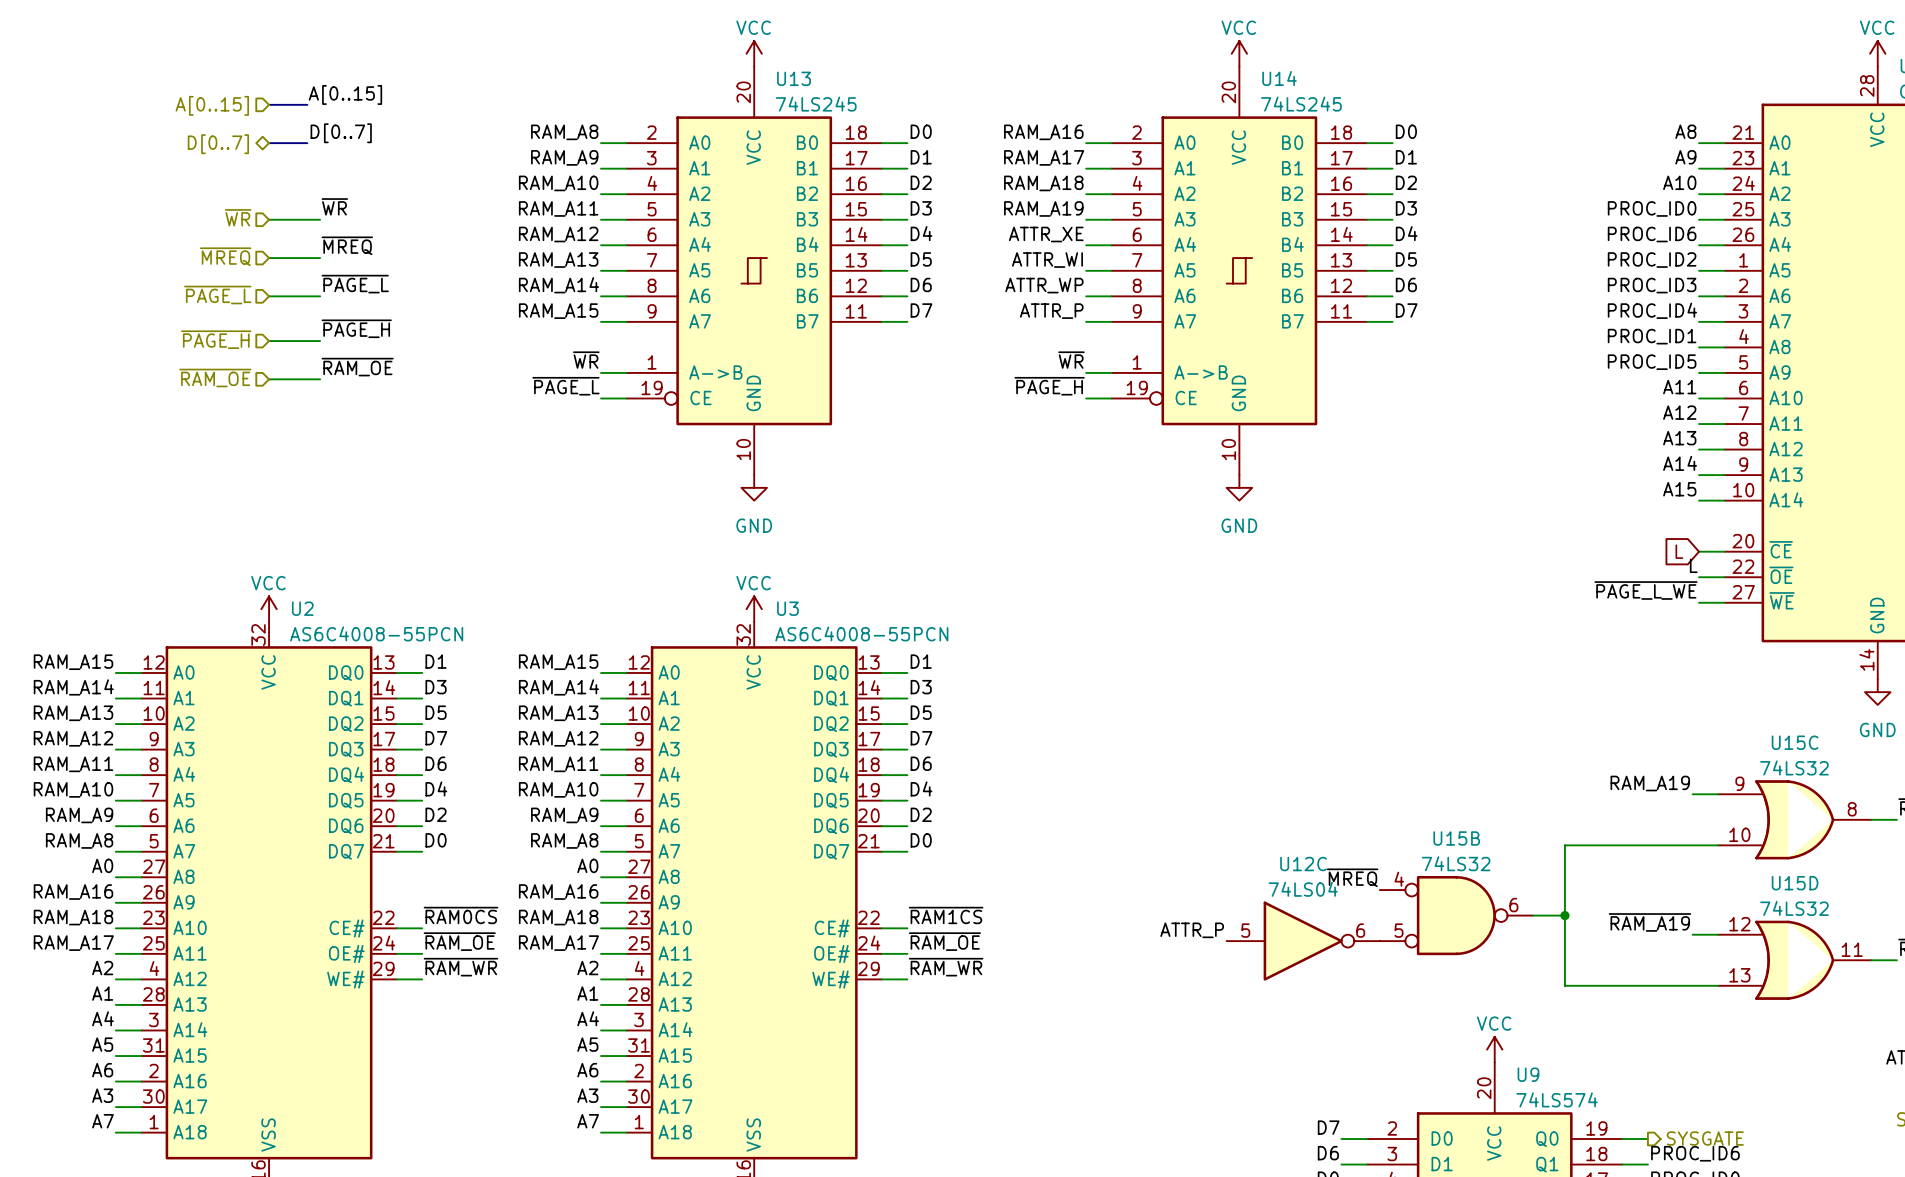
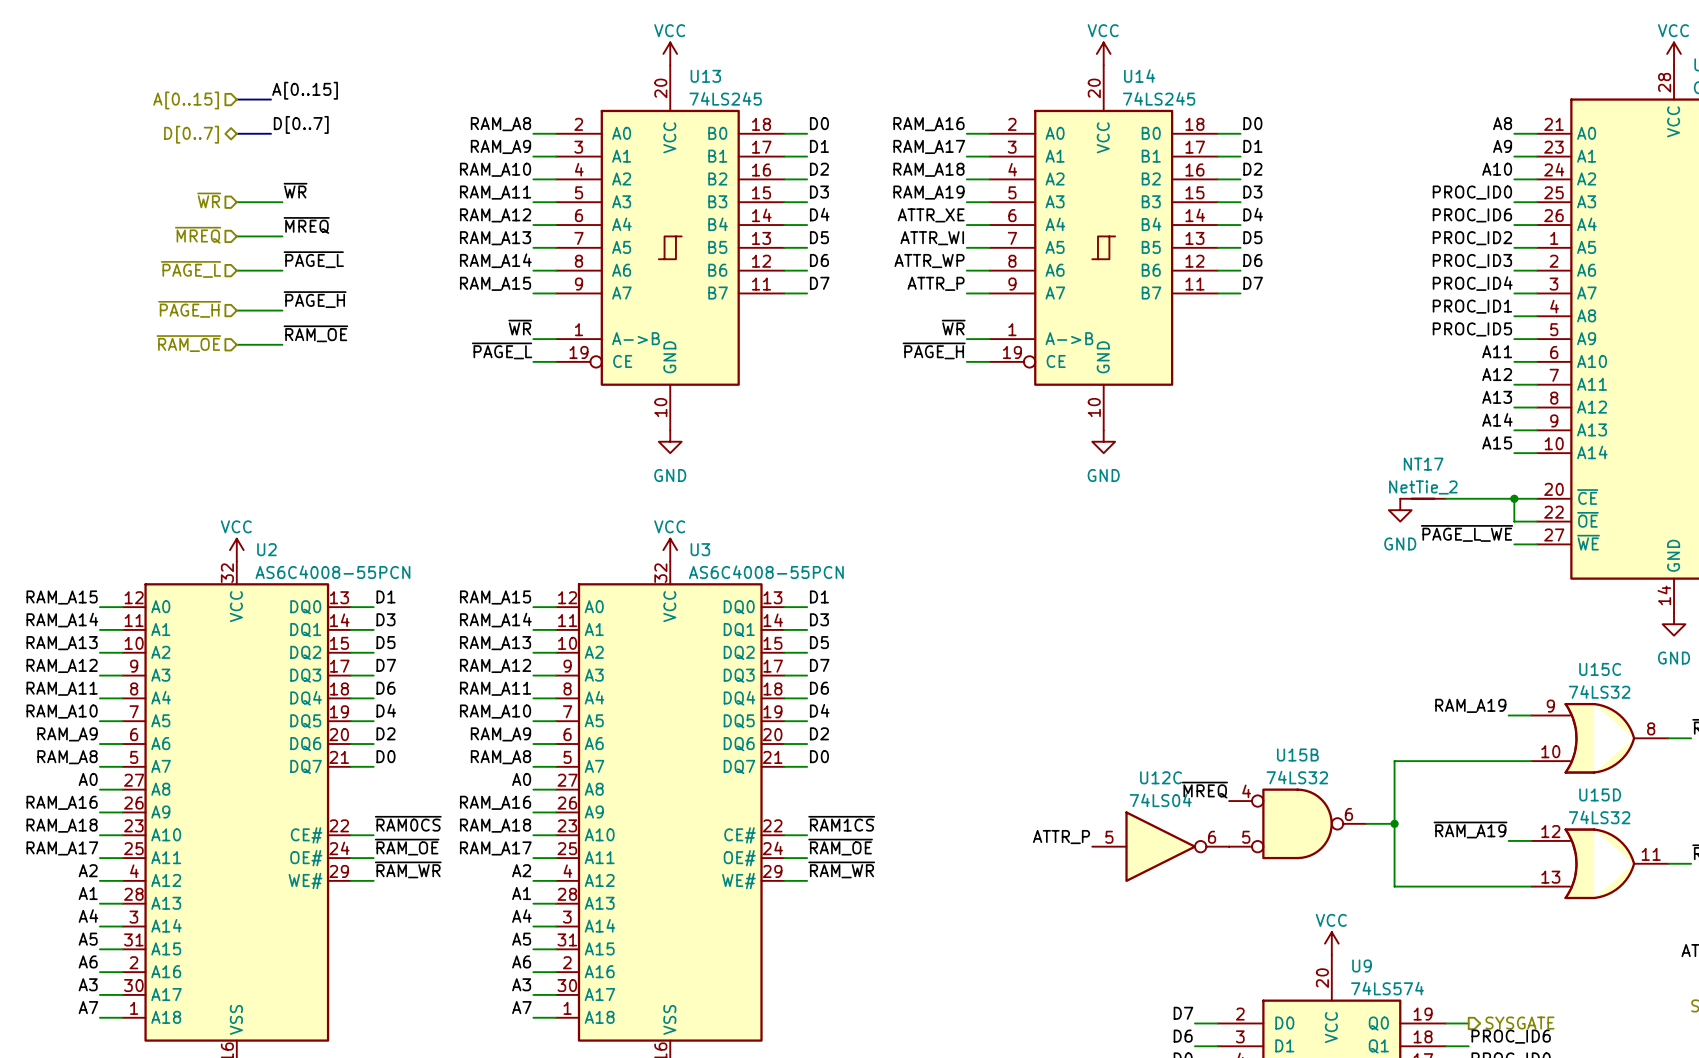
NT17: none -> NetTie_2 (1423, 498)
wire: none -> (1445, 498) (1514, 498) (1514, 521)
global label: L (1679, 551) -> none
junction: none -> (1514, 498)
power symbol: none -> GND (1400, 510)
label: L (1693, 565) -> none

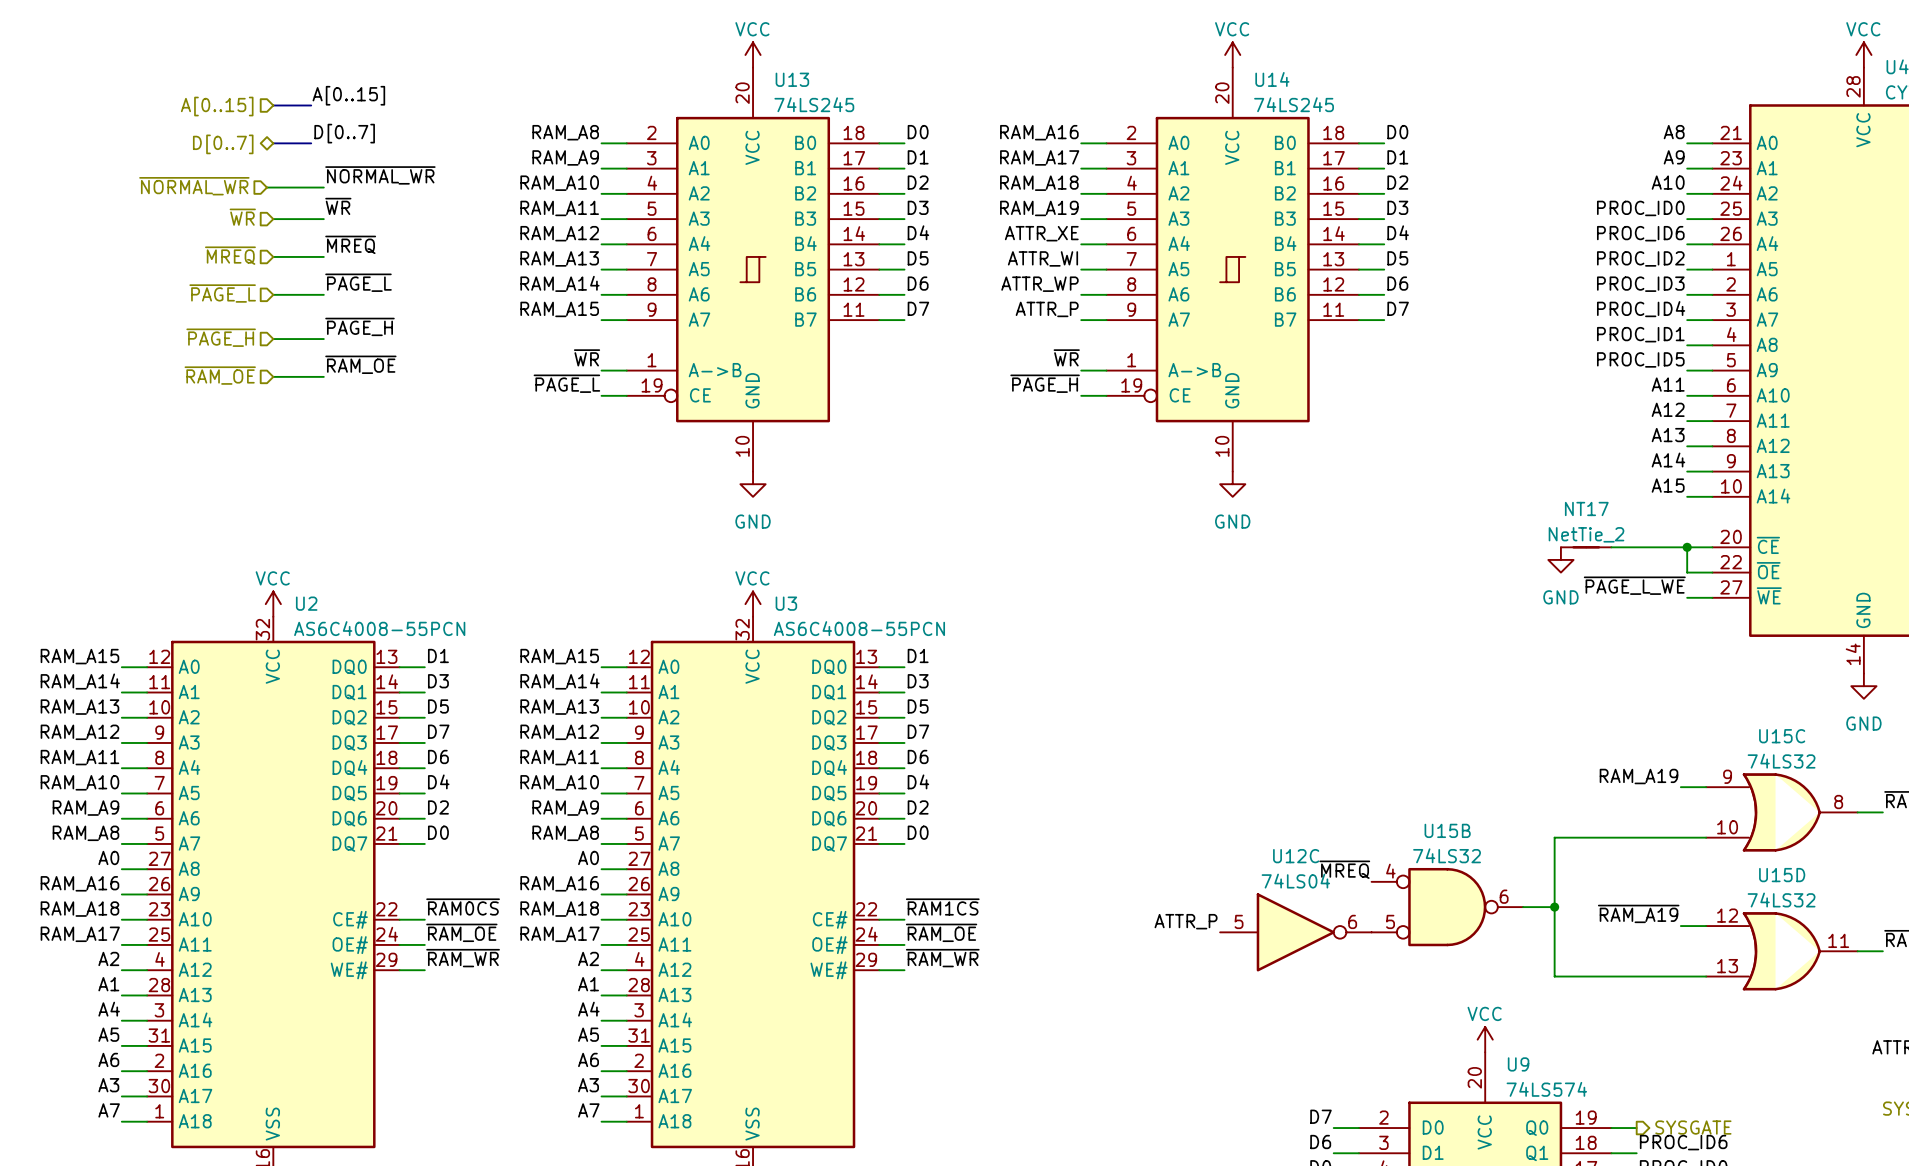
label: none -> ~{NORMAL_WR} (380, 175)
hierarchical label: none -> ~{NORMAL_WR} (194, 186)
wire: none -> (267, 187) (323, 187)

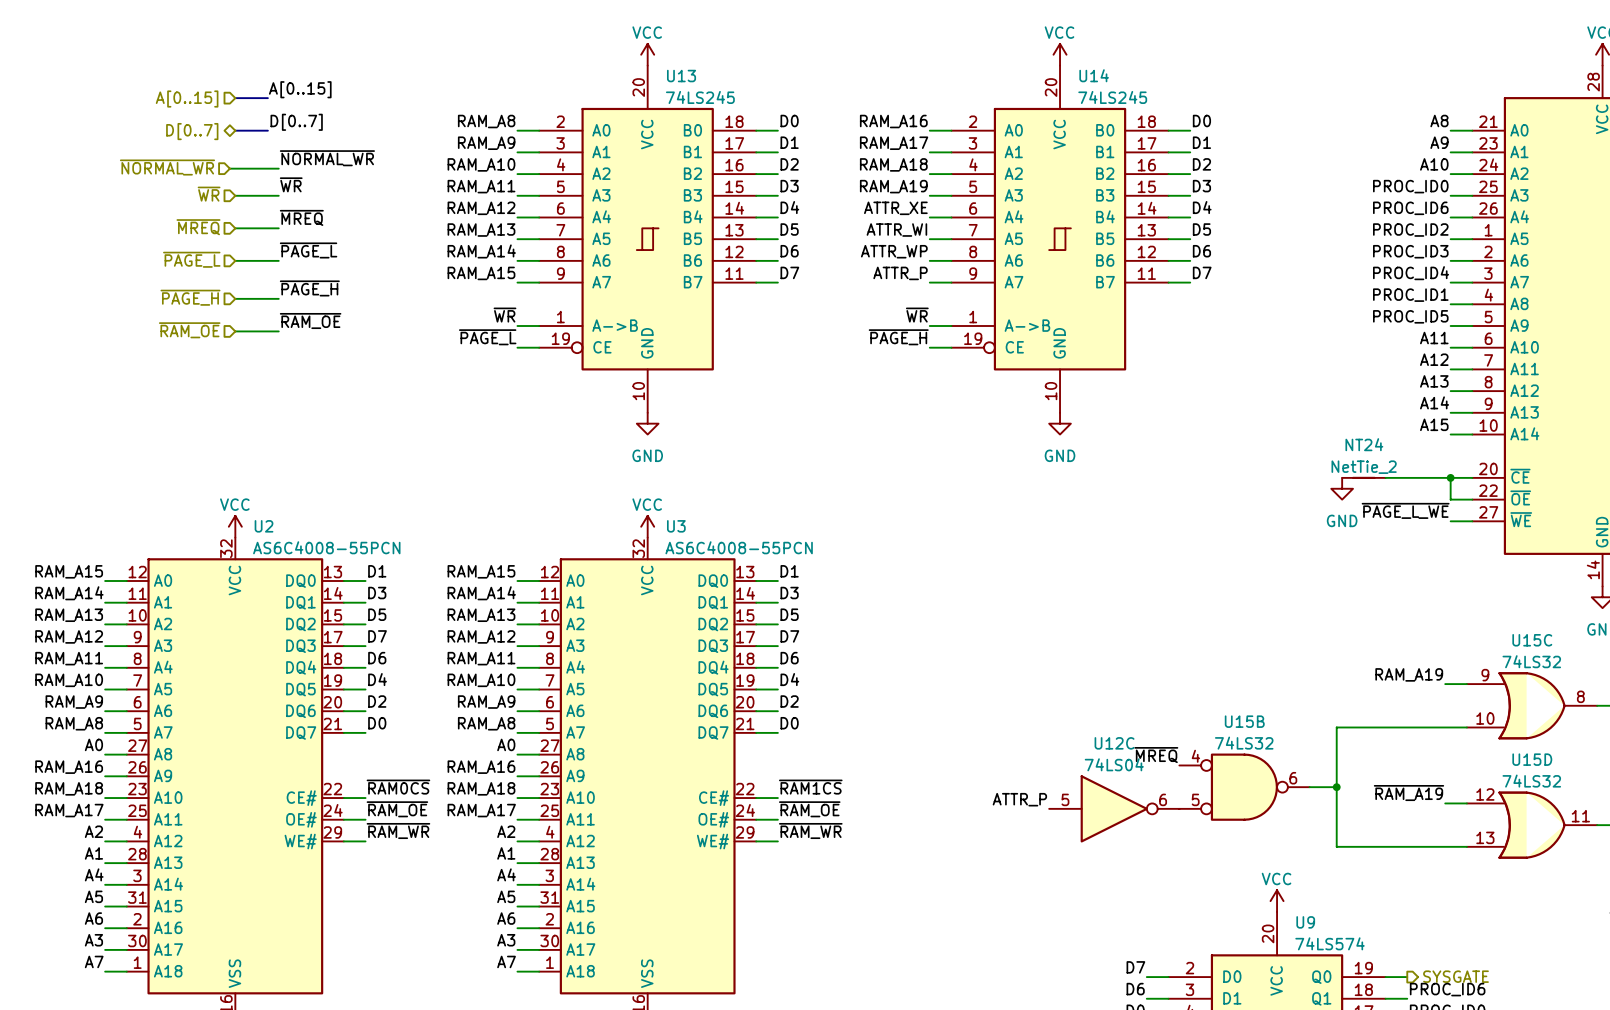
NT17 name: NT17 (1586, 508) -> NT24 (1364, 444)

